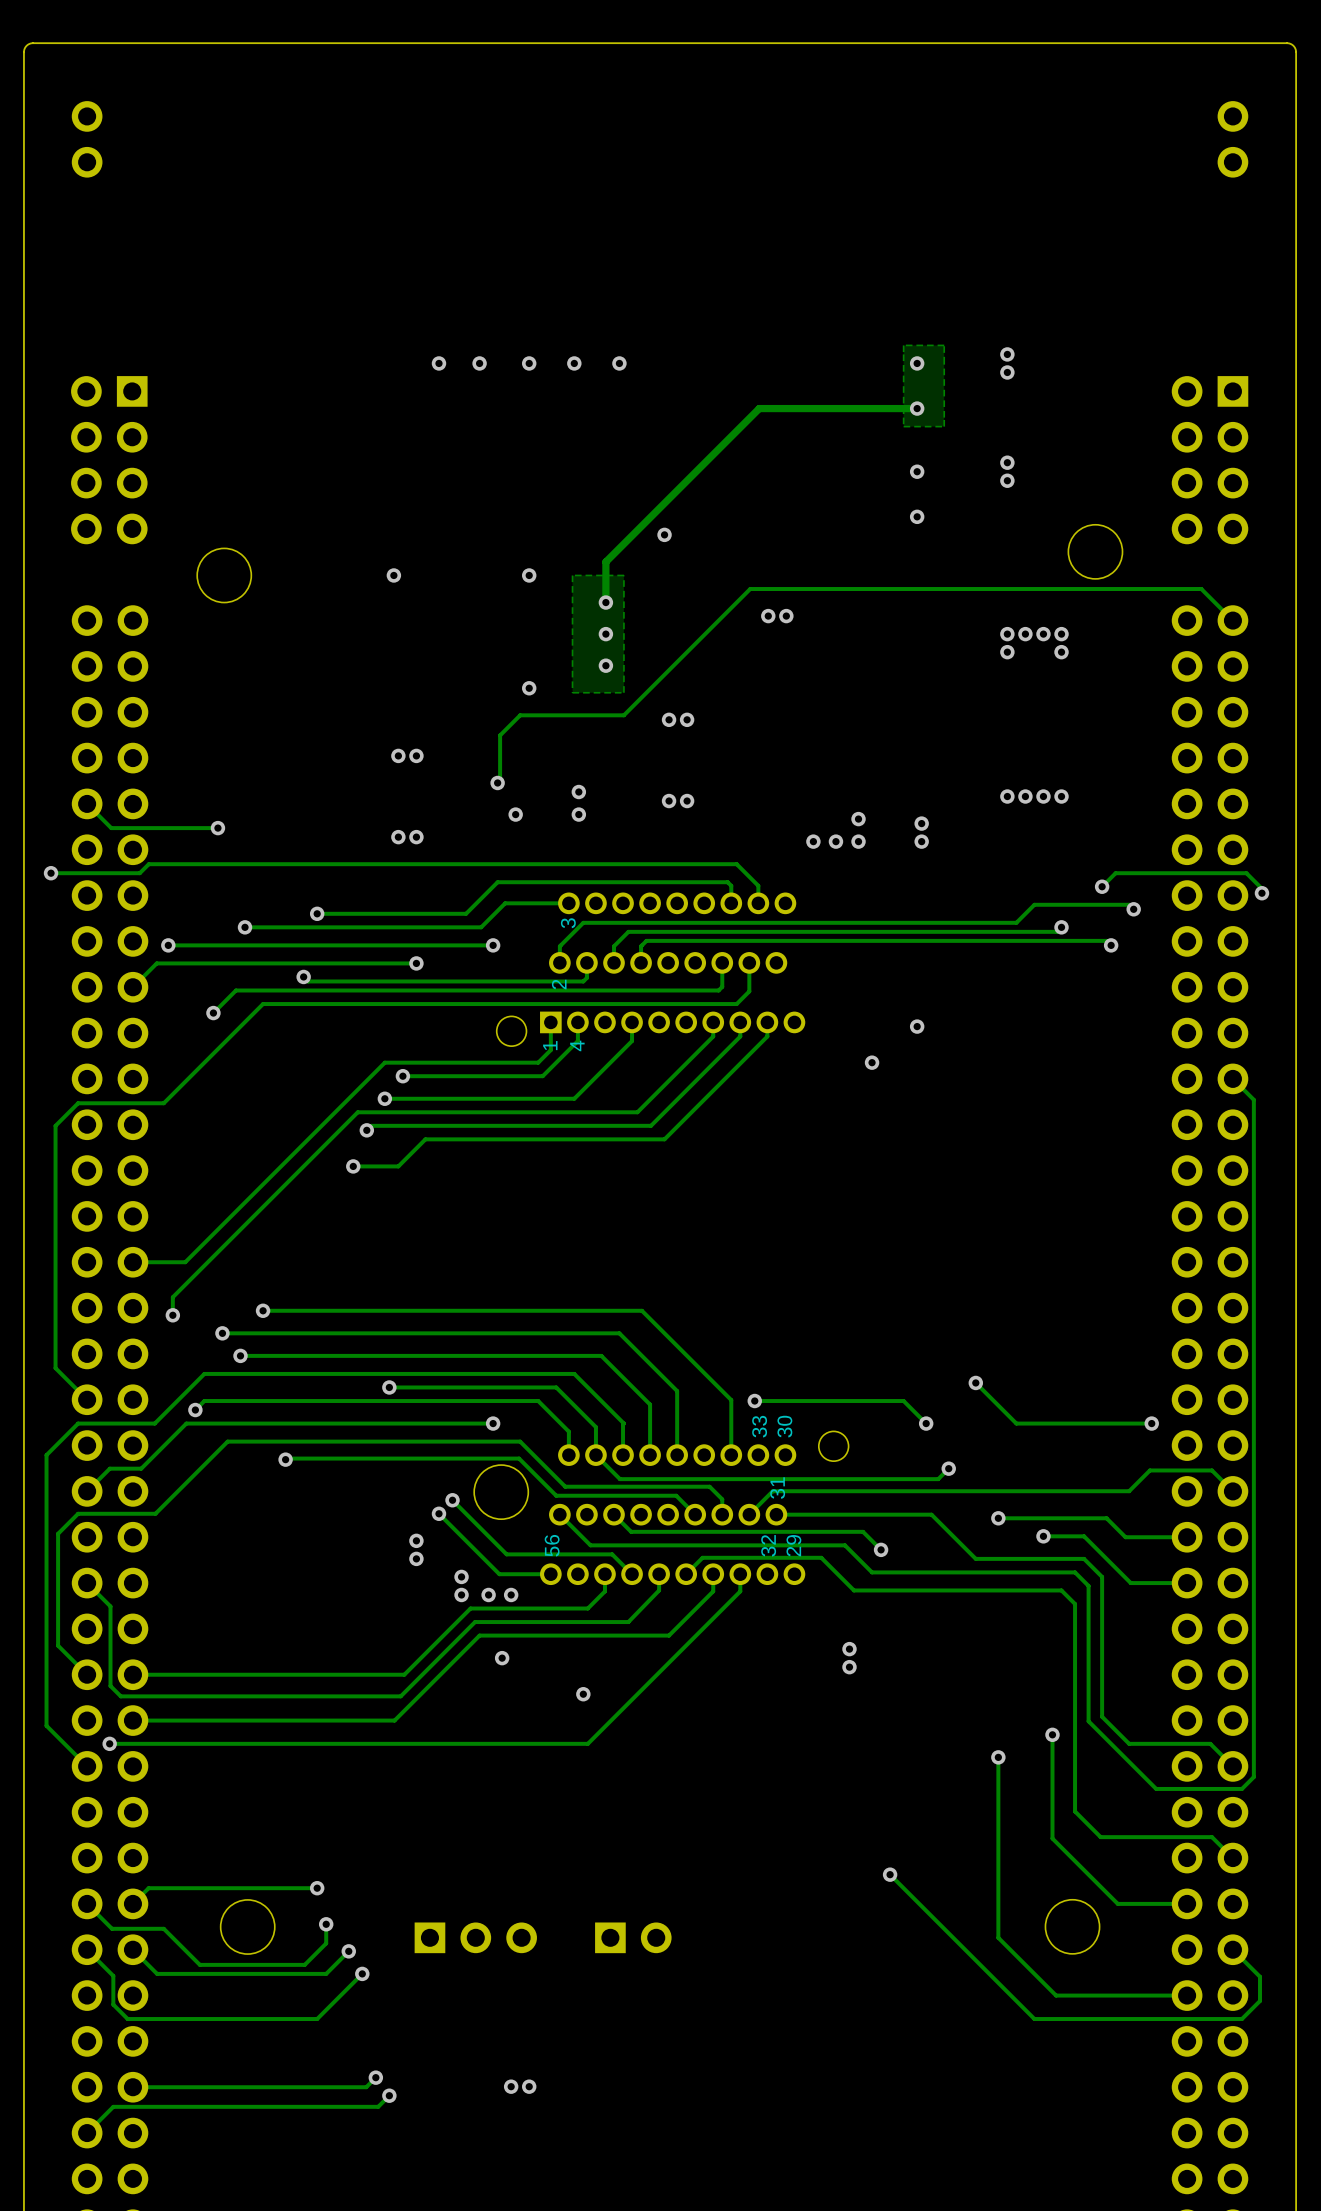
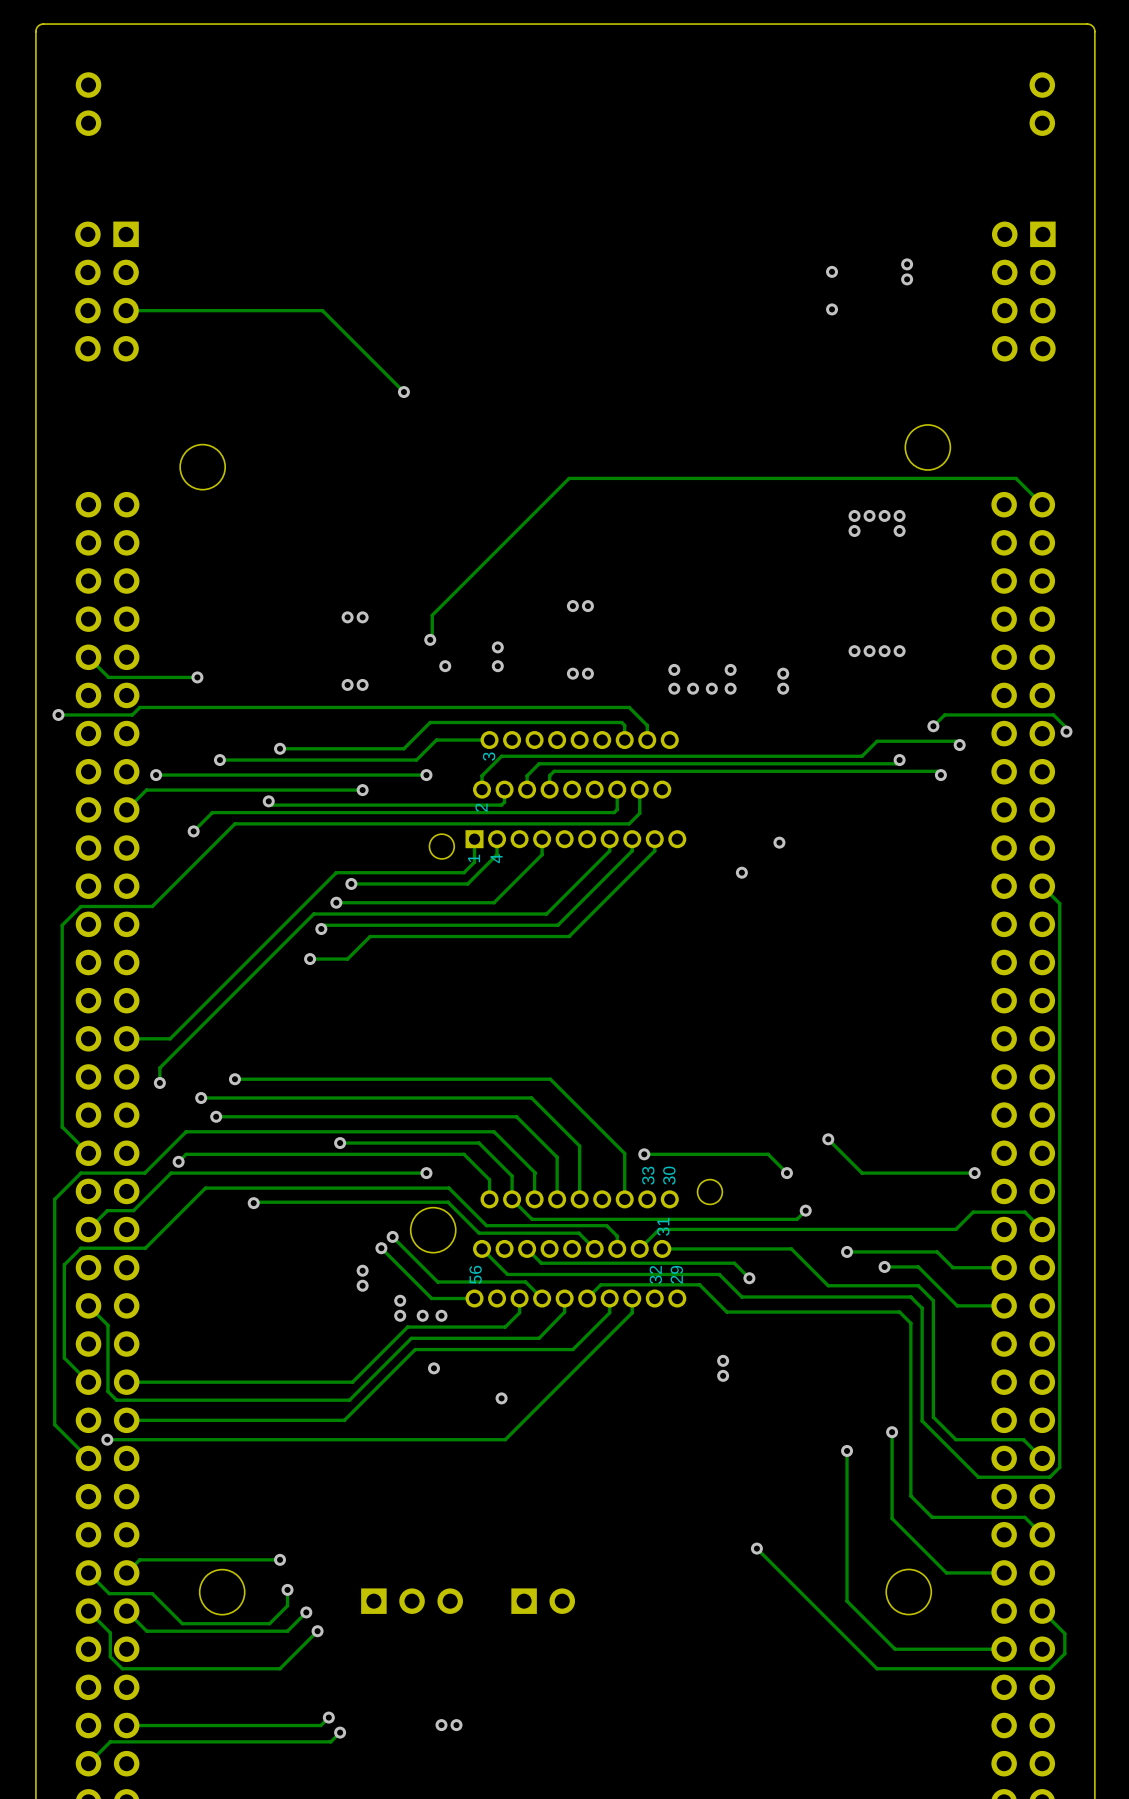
via: none -> (907, 264)
via: none -> (832, 271)
zone outline: (944, 345) (944, 426) (903, 426) (903, 345) (944, 345) -> none
via: none -> (907, 279)
via: (1007, 354) -> none
via: (438, 363) -> none
via: (479, 363) -> none
via: (529, 363) -> none
via: (574, 363) -> none
via: (619, 363) -> none
via: (917, 363) -> none
via: (1007, 372) -> none
via: none -> (832, 309)
track: none -> (126, 310) (322, 310) (403, 392)
track: (917, 408) (759, 408) (605, 561) (605, 602) -> none
via: (917, 408) -> none
part position: (109, 460) -> (106, 291)
part position: (1210, 460) -> (1023, 291)
via: (1007, 462) -> none
via: (917, 471) -> none
via: (1007, 480) -> none
via: none -> (403, 392)
via: (917, 516) -> none
via: (664, 534) -> none
via: (393, 575) -> none
via: (529, 575) -> none
zone outline: (623, 575) (623, 692) (572, 692) (572, 575) (623, 575) -> none
track: (750, 589) (623, 715) (520, 715) (500, 735) (500, 753) -> (640, 478) (569, 478) (432, 615)
via: (605, 602) -> none
via: (768, 616) -> none
via: (786, 616) -> none
via: (605, 634) -> none
via: (605, 665) -> none
via: (529, 688) -> none
via: (669, 719) -> none
via: (687, 719) -> none
via: none -> (572, 606)
via: none -> (587, 606)
via: (669, 801) -> none
via: (687, 801) -> none
via: none -> (674, 669)
via: none -> (572, 673)
via: none -> (587, 673)
via: none -> (674, 688)

